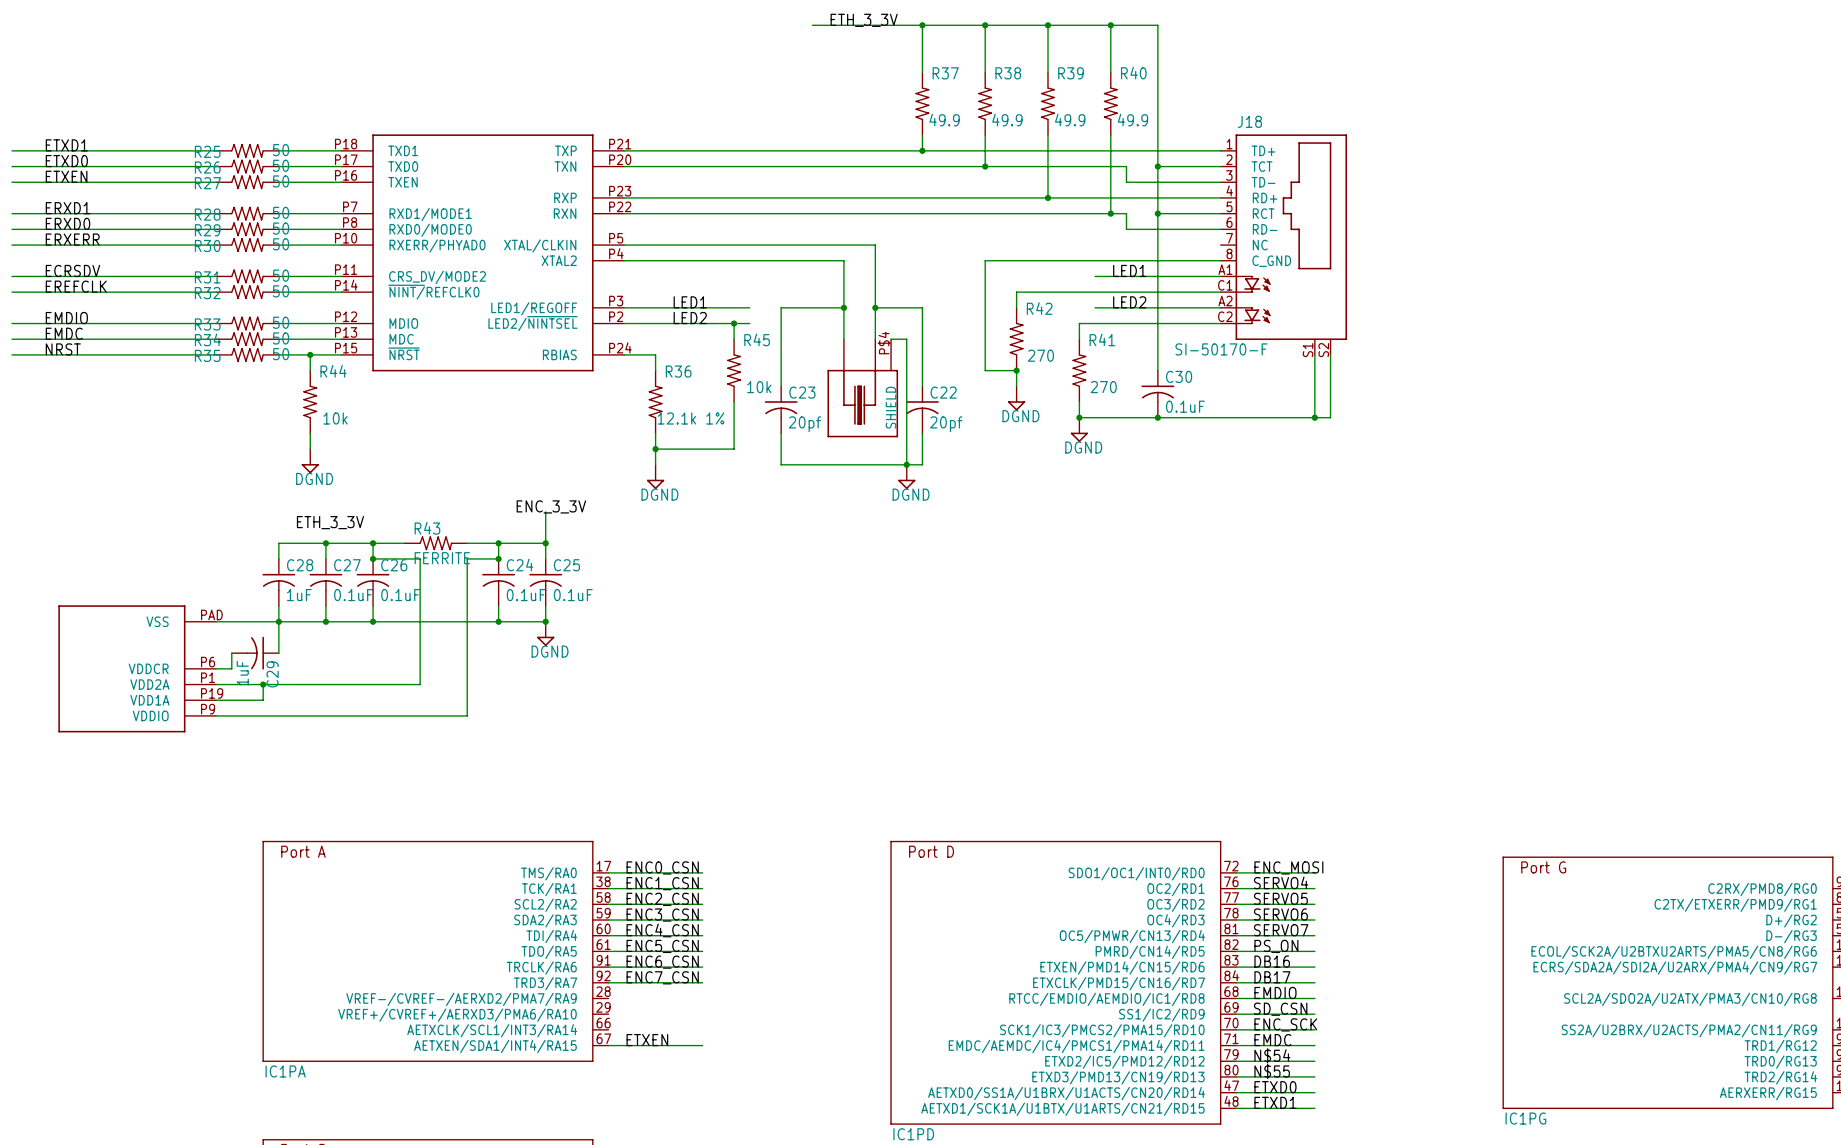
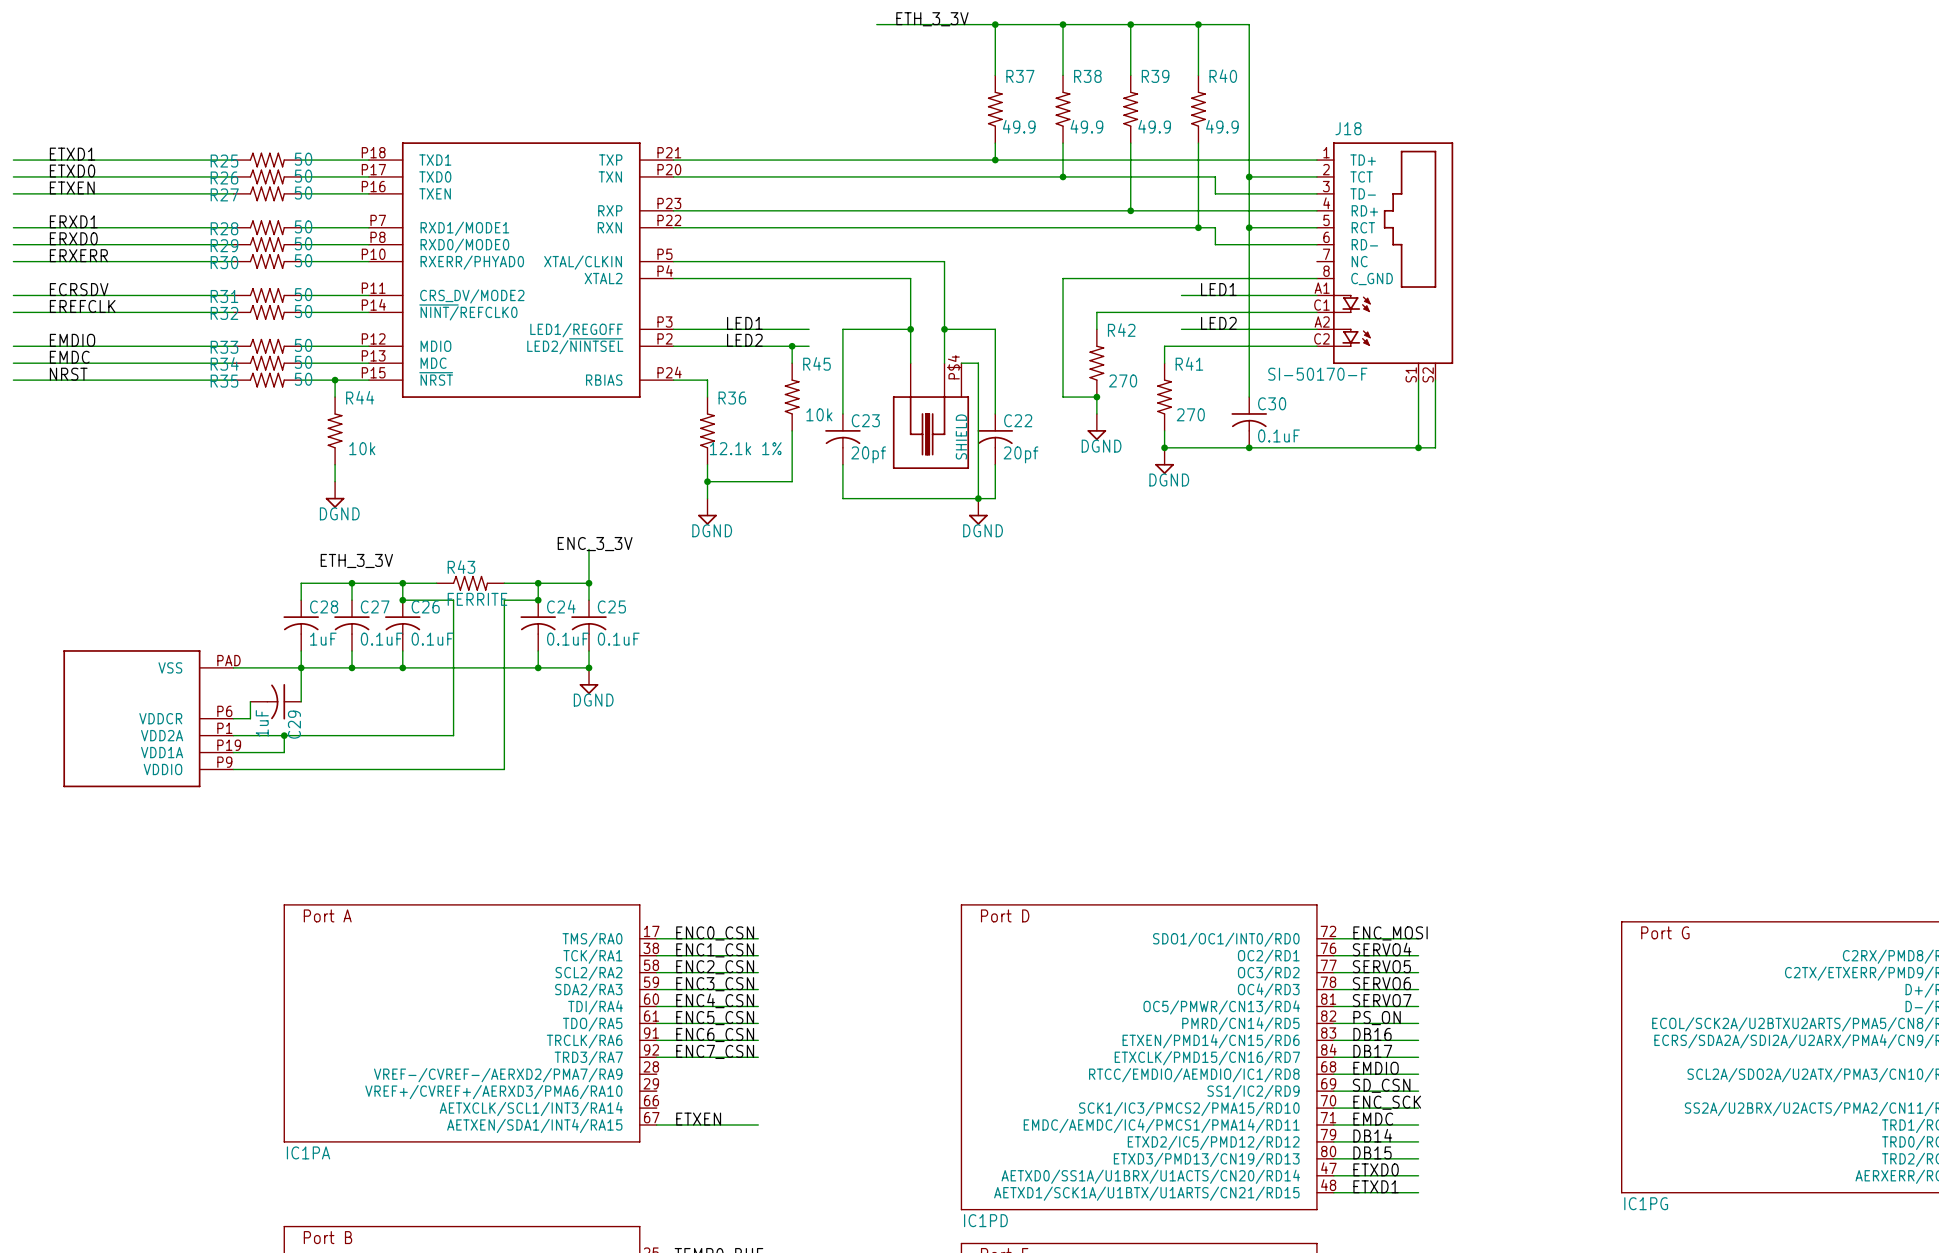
label: N$54 (1272, 1055) -> DB14 (1372, 1135)
label: N$55 (1272, 1071) -> DB15 (1372, 1152)

